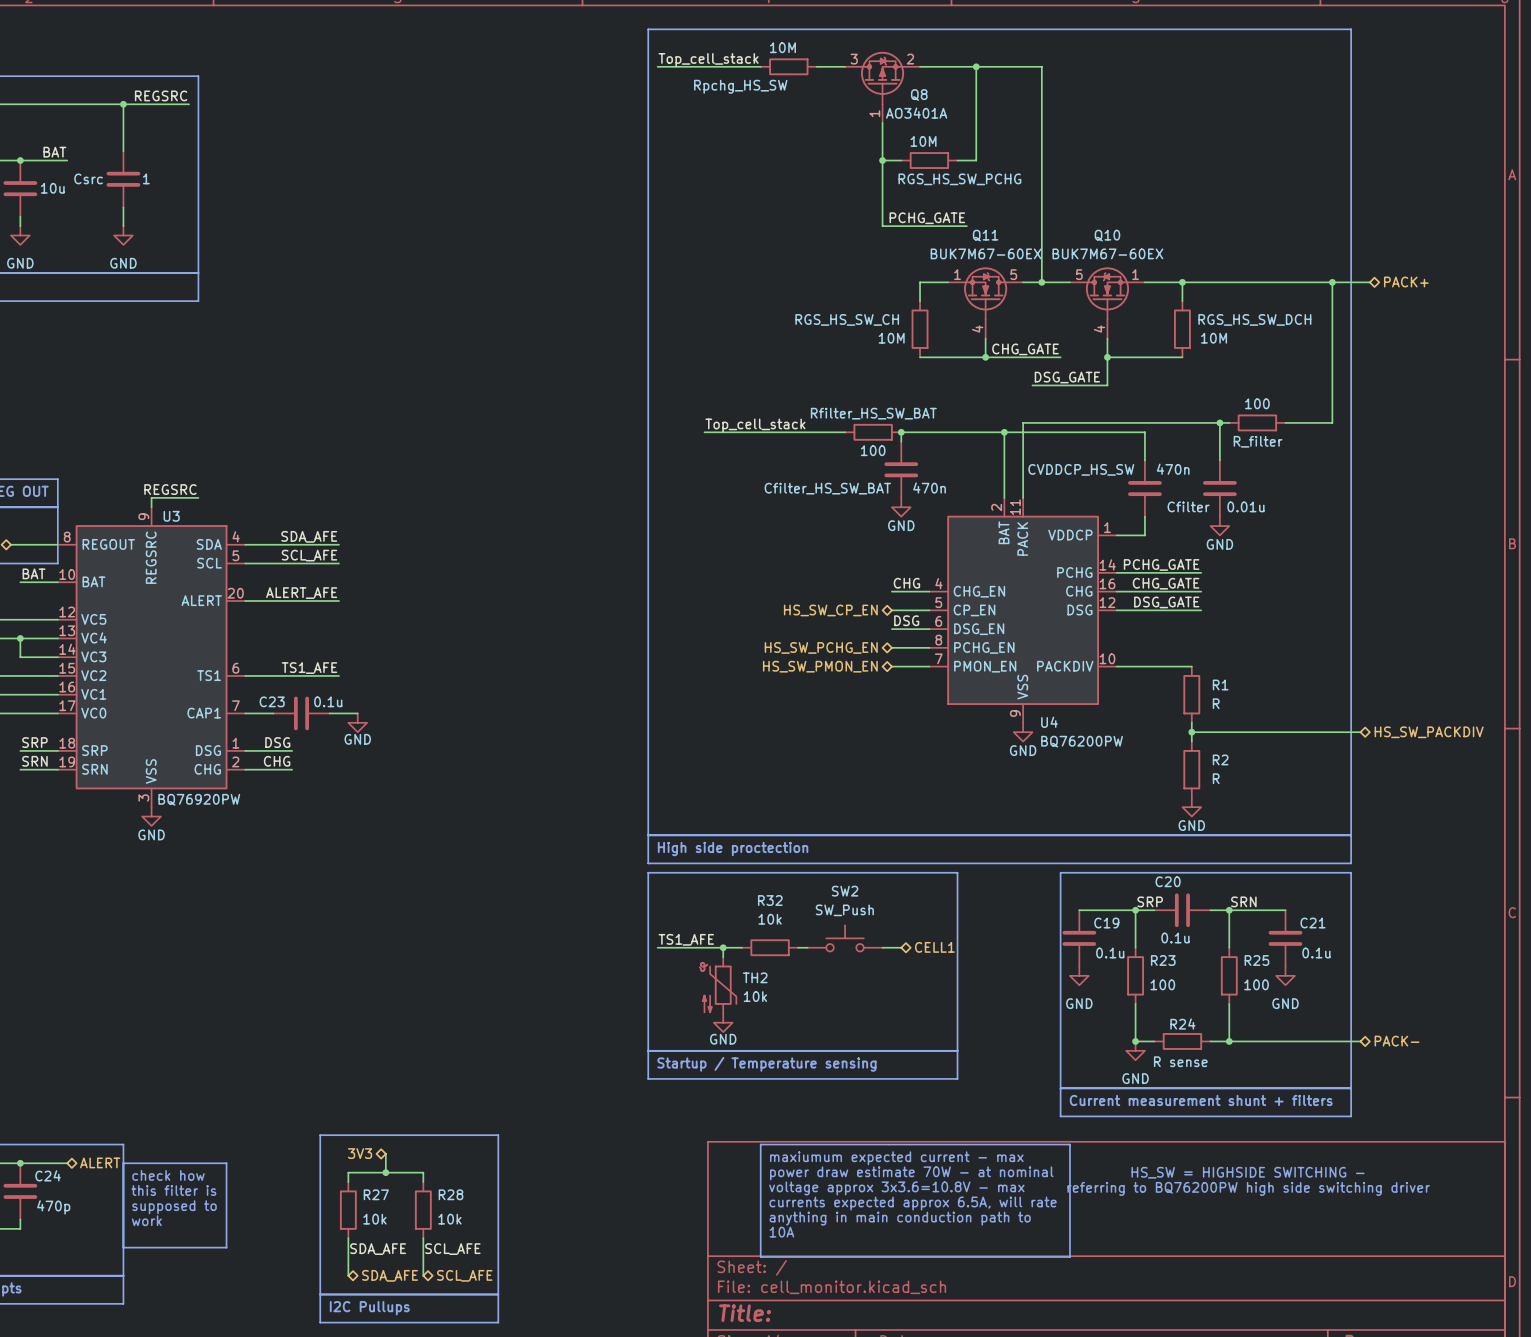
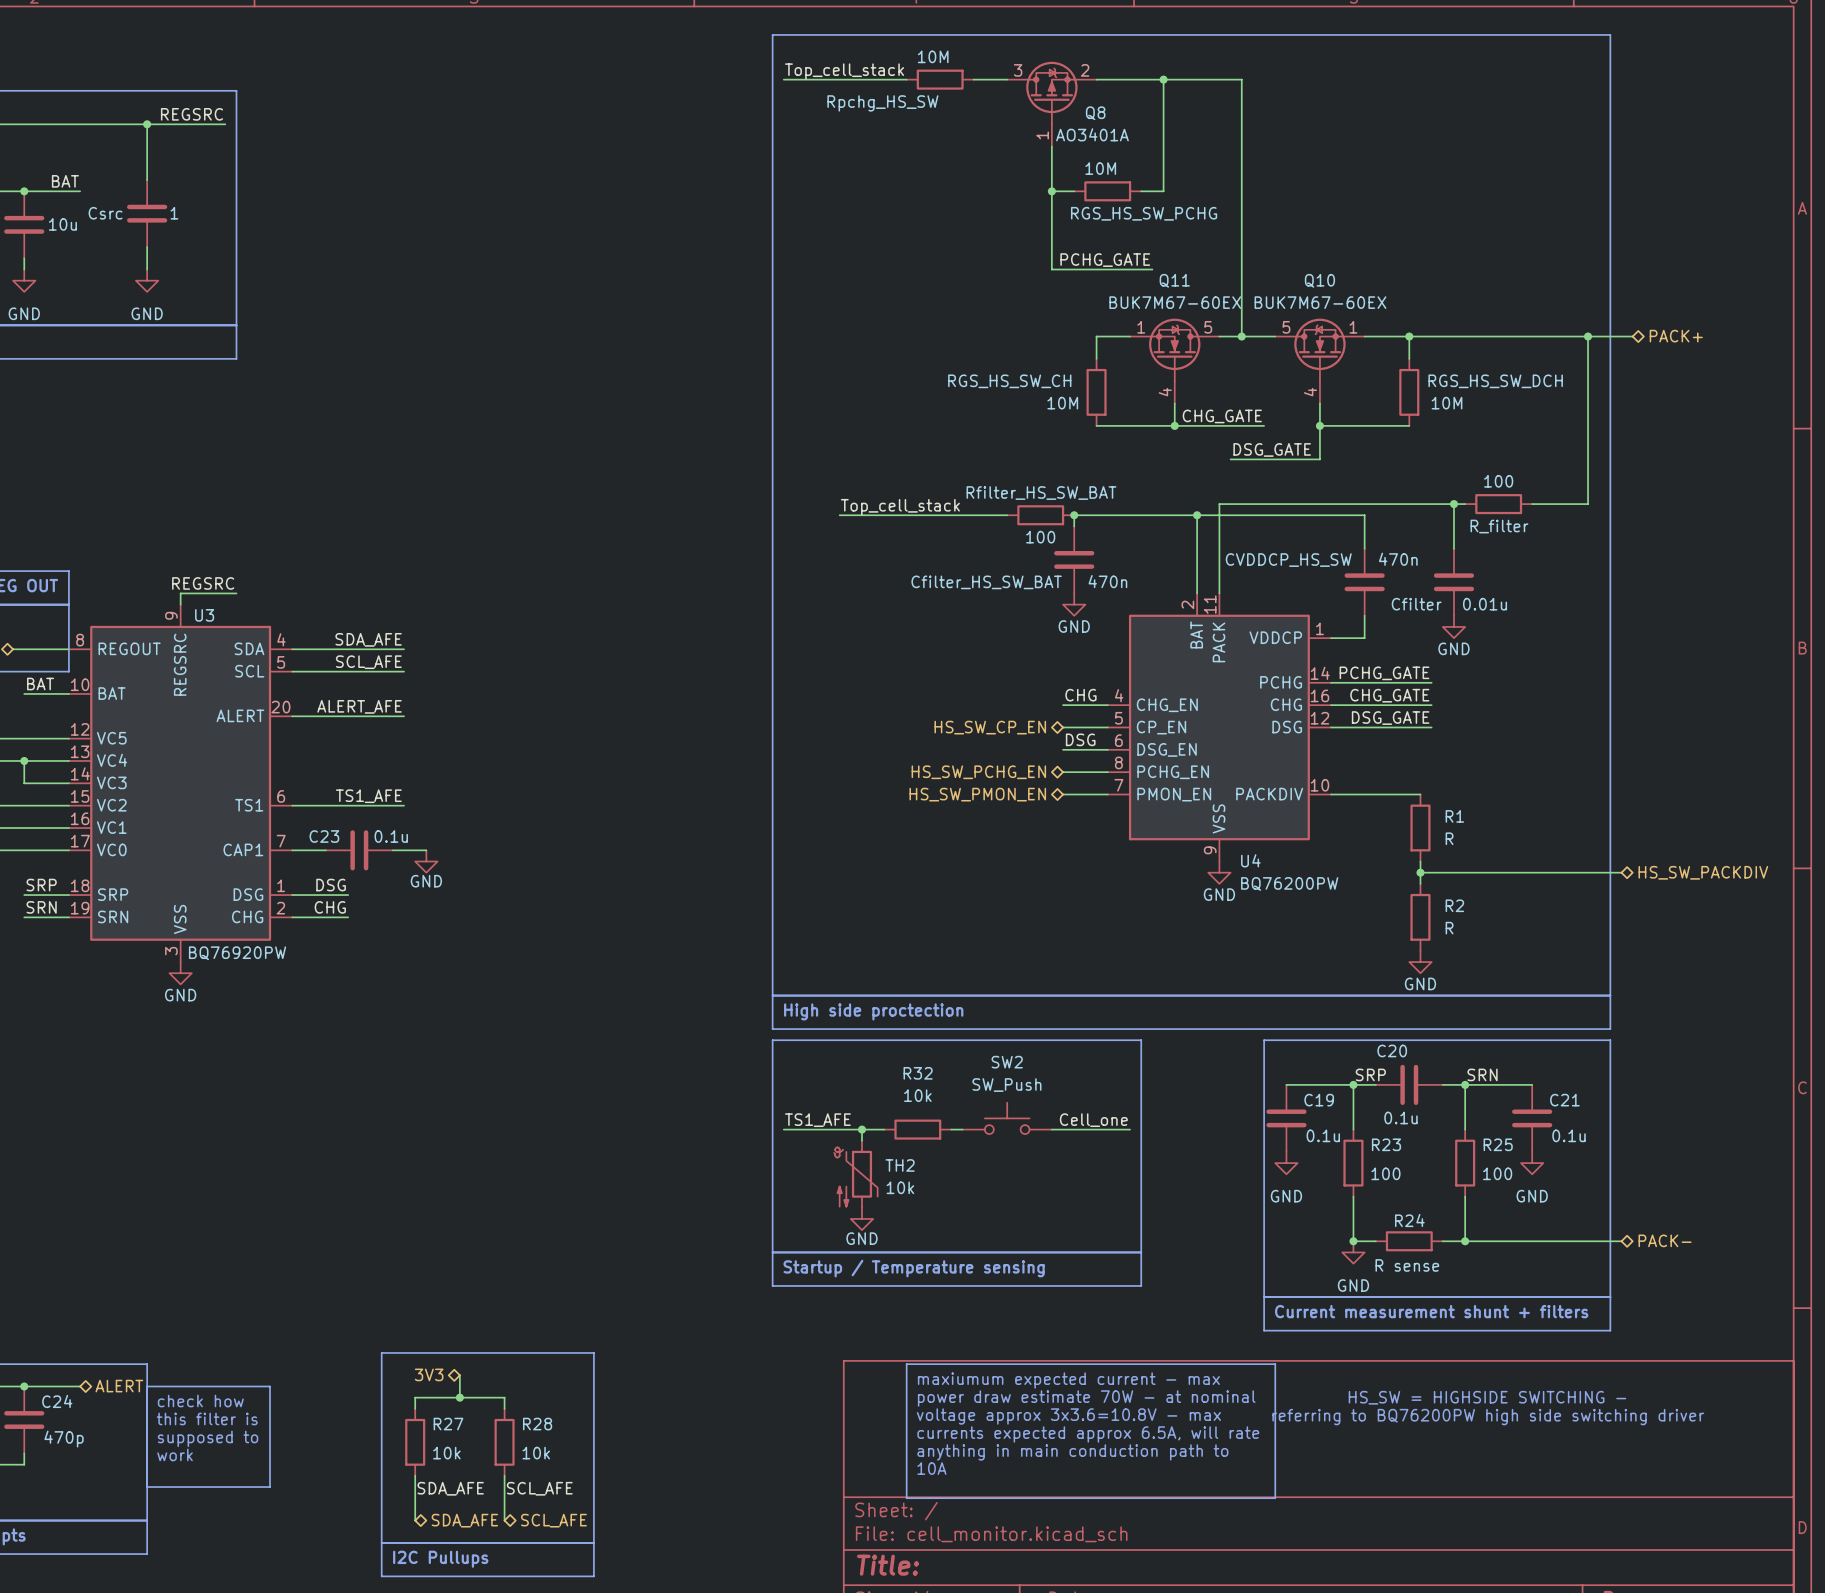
label: none -> Cell_one (1093, 1120)
wire: none -> (1074, 1129) (1130, 1129)
hierarchical label: CELL1 (934, 947) -> none

